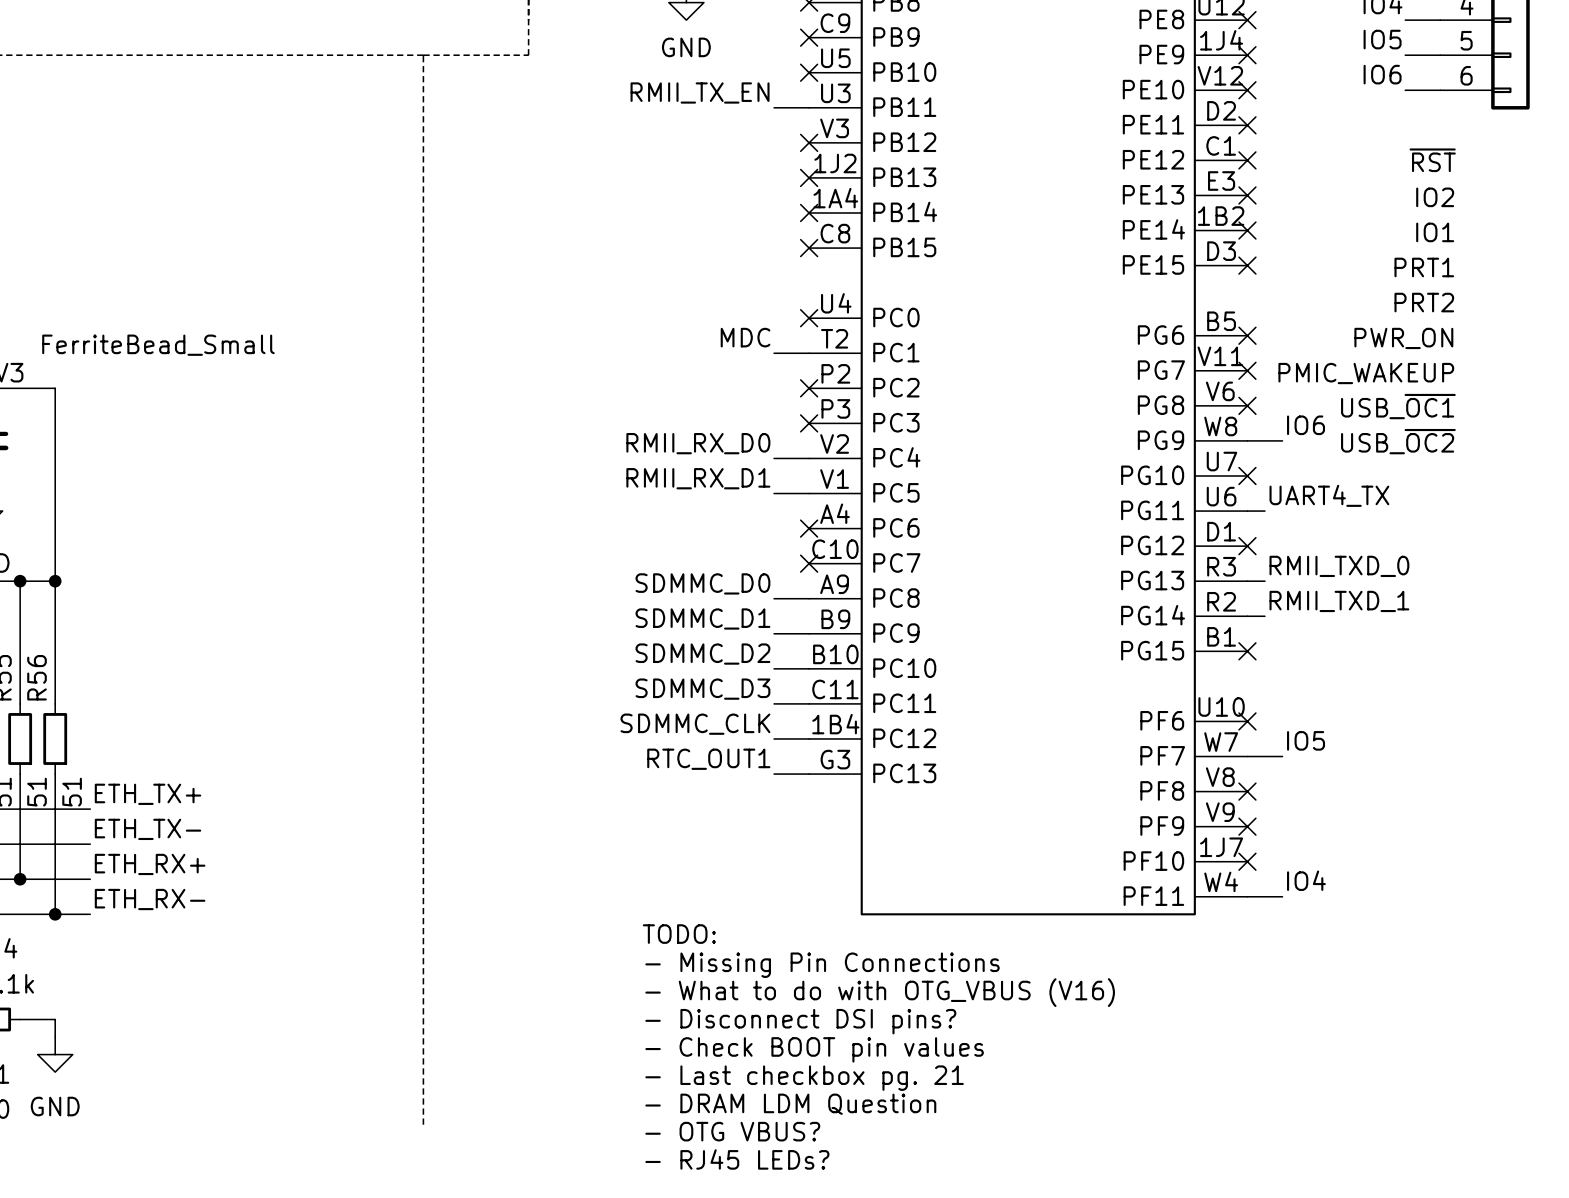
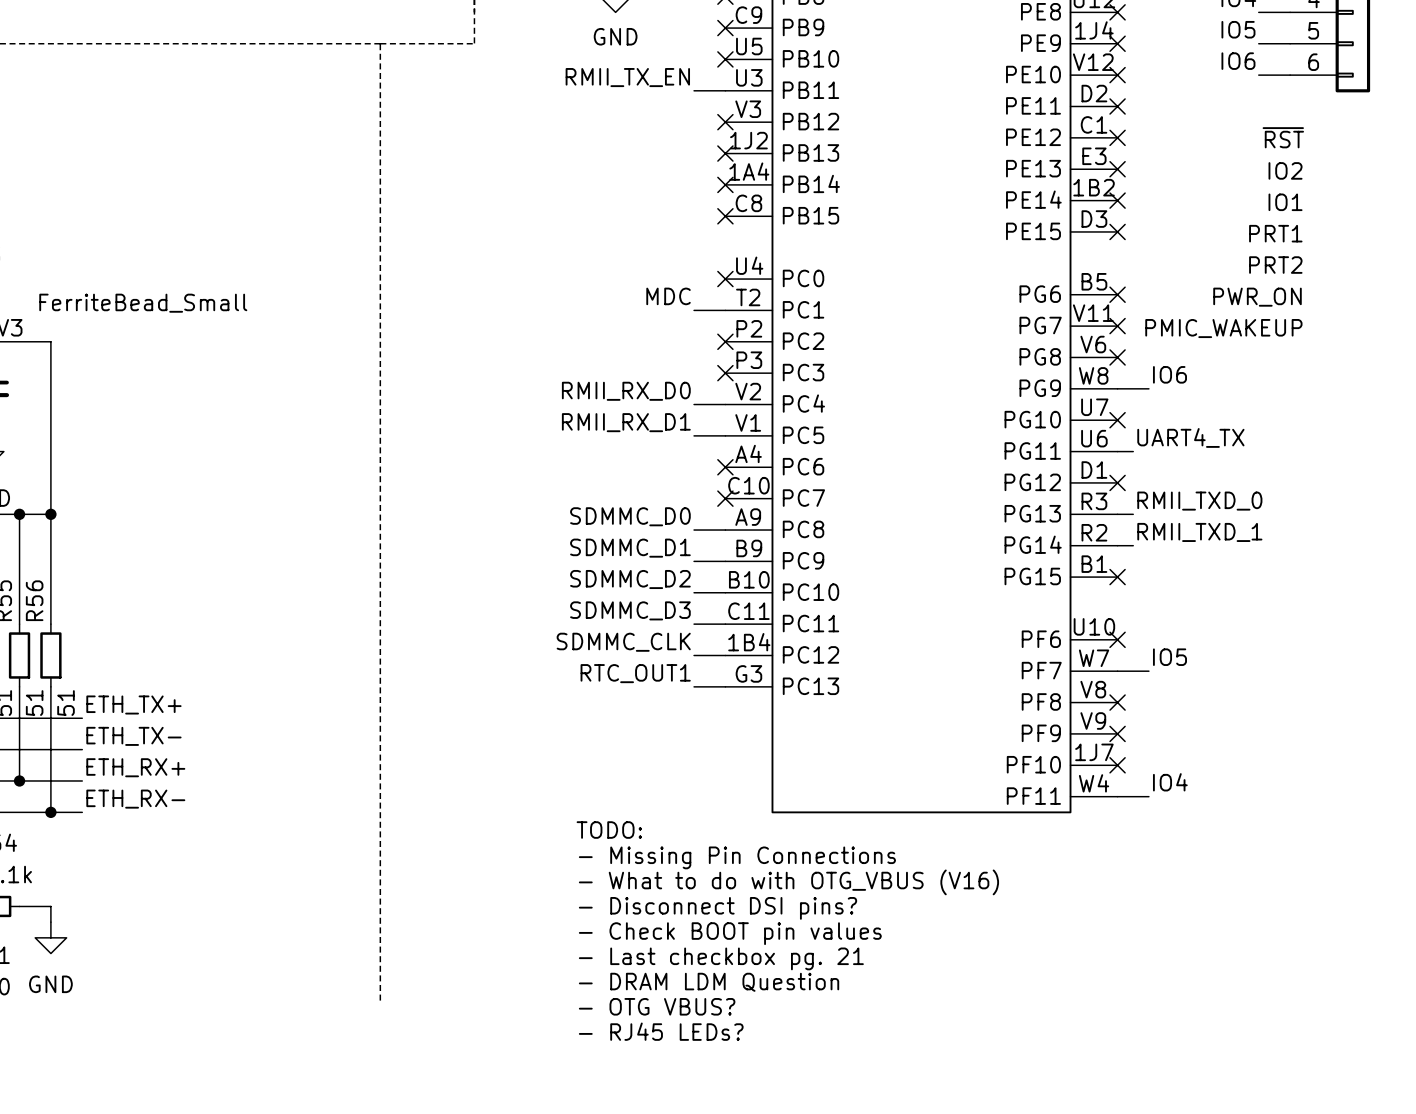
label: USB_~{OC1} (1398, 406) -> none
label: USB_~{OC2} (1398, 441) -> none

